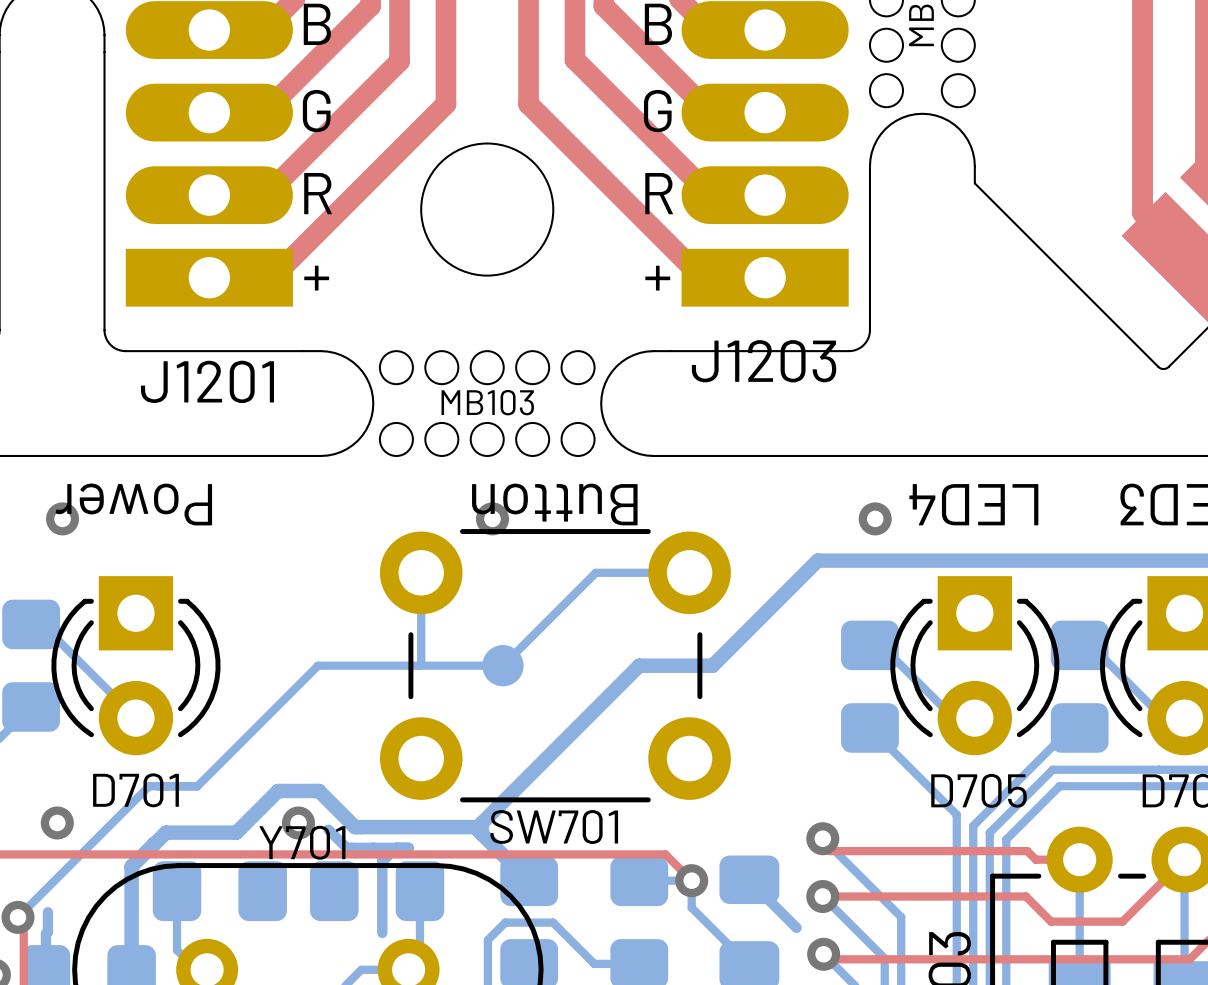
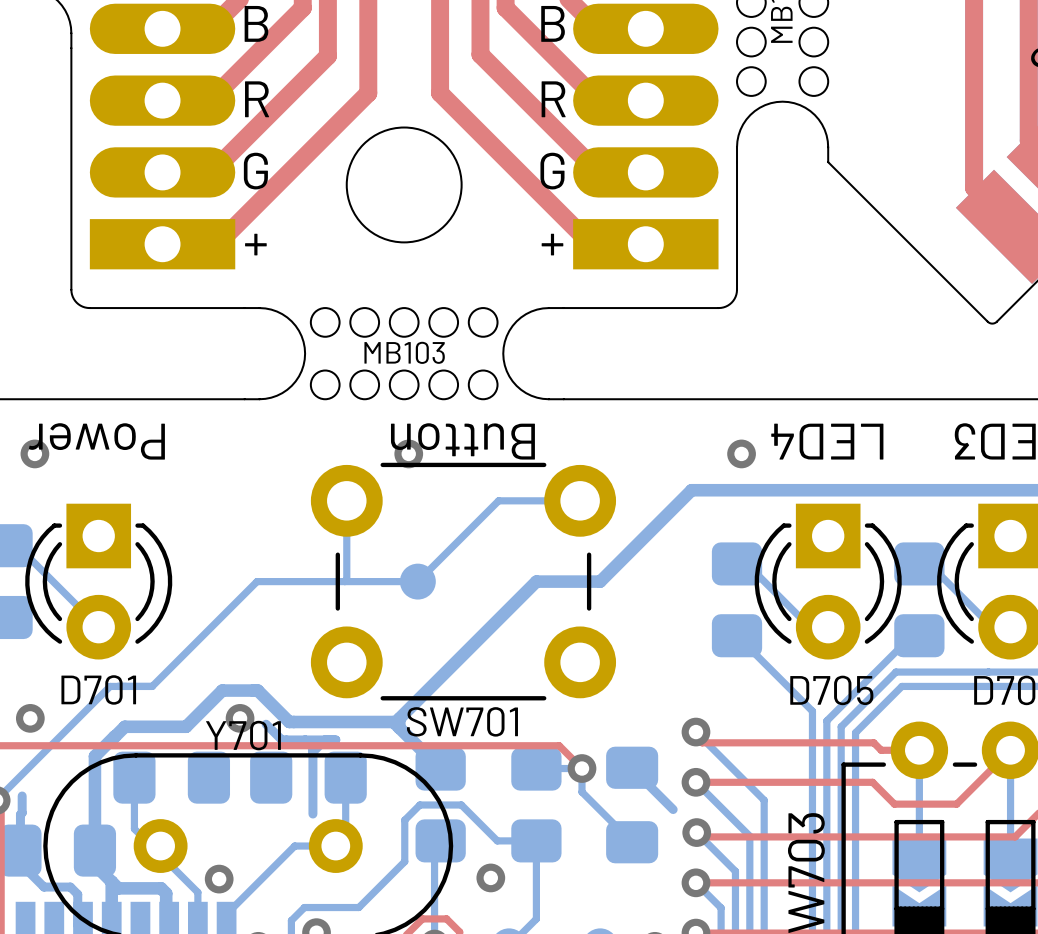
J1201 text: G (316, 111) -> R (257, 99)
J1203 text: G (657, 111) -> R (553, 99)
J1201 text: R (318, 193) -> G (255, 171)
J1203 text: R (659, 193) -> G (552, 171)
J1203 name: J1203 (764, 361) -> none
J1201 name: J1201 (207, 381) -> none

